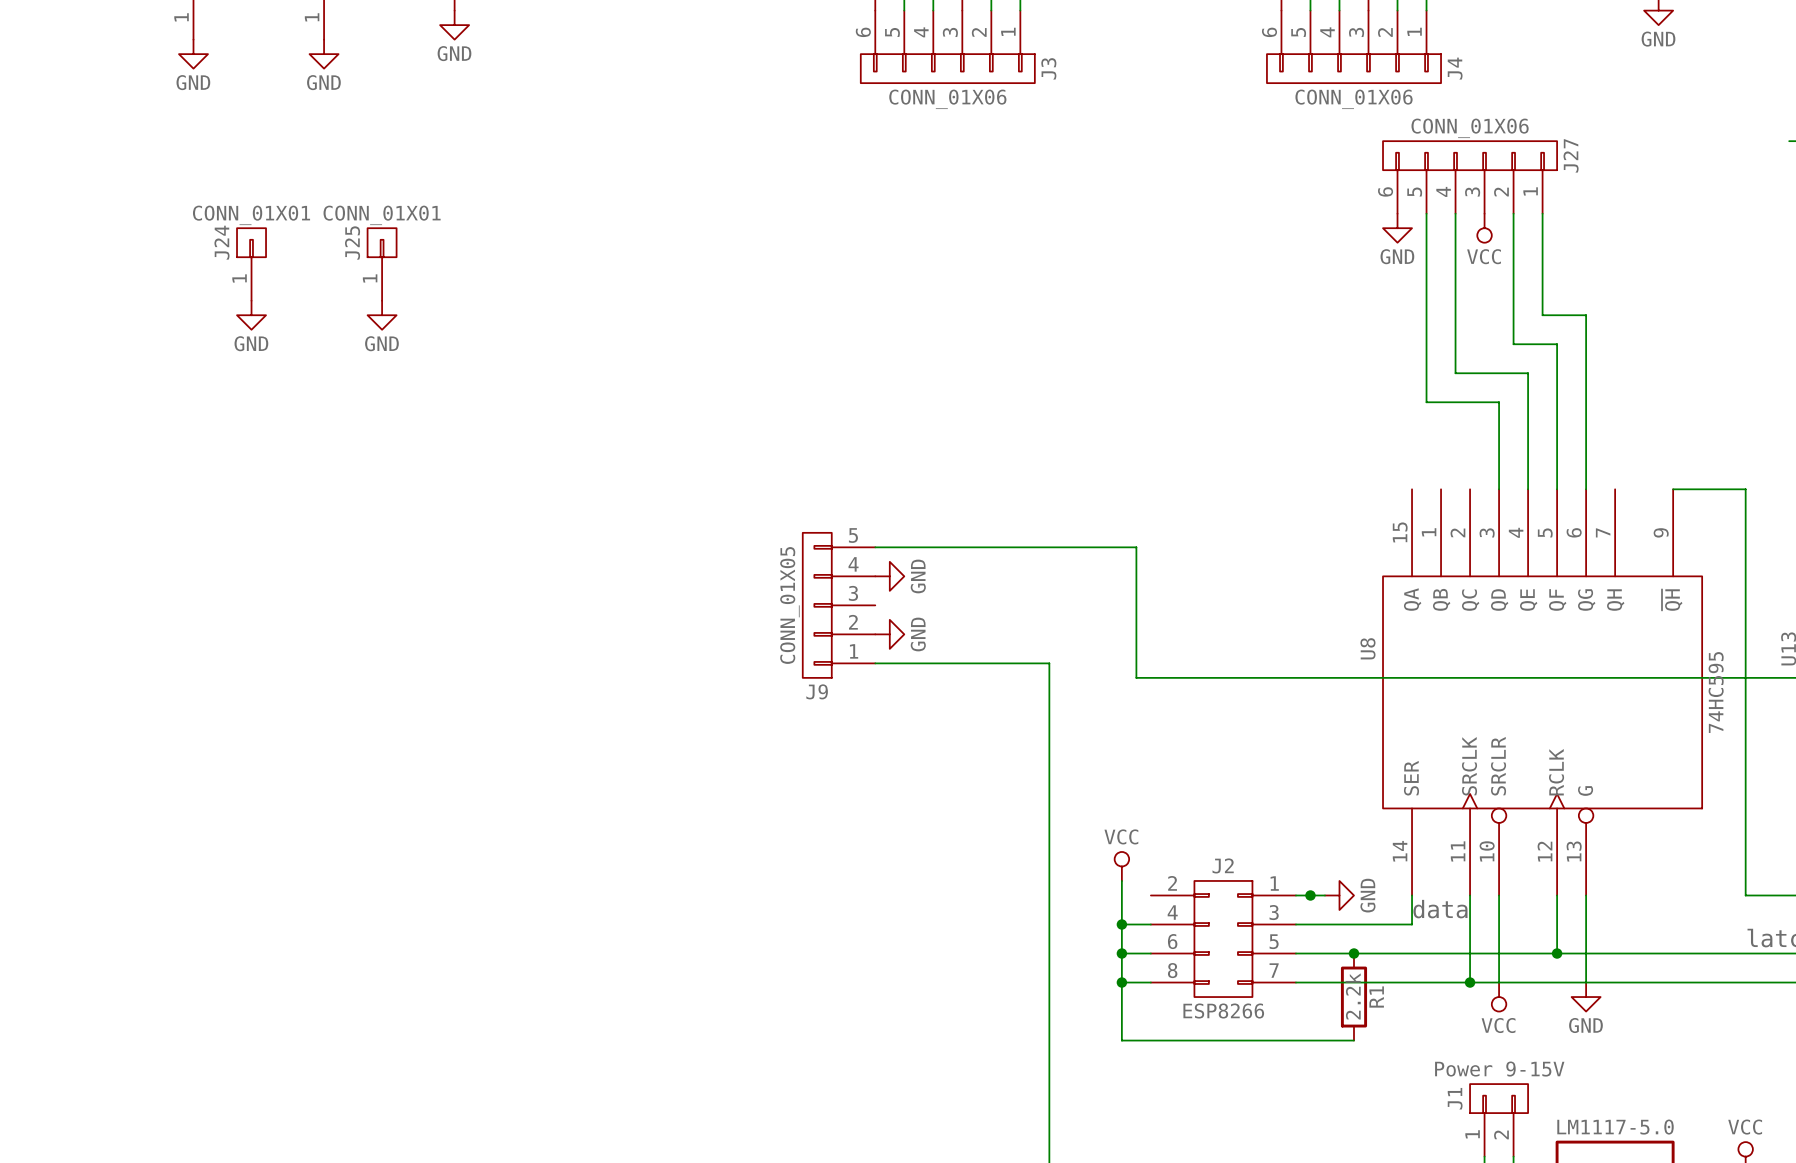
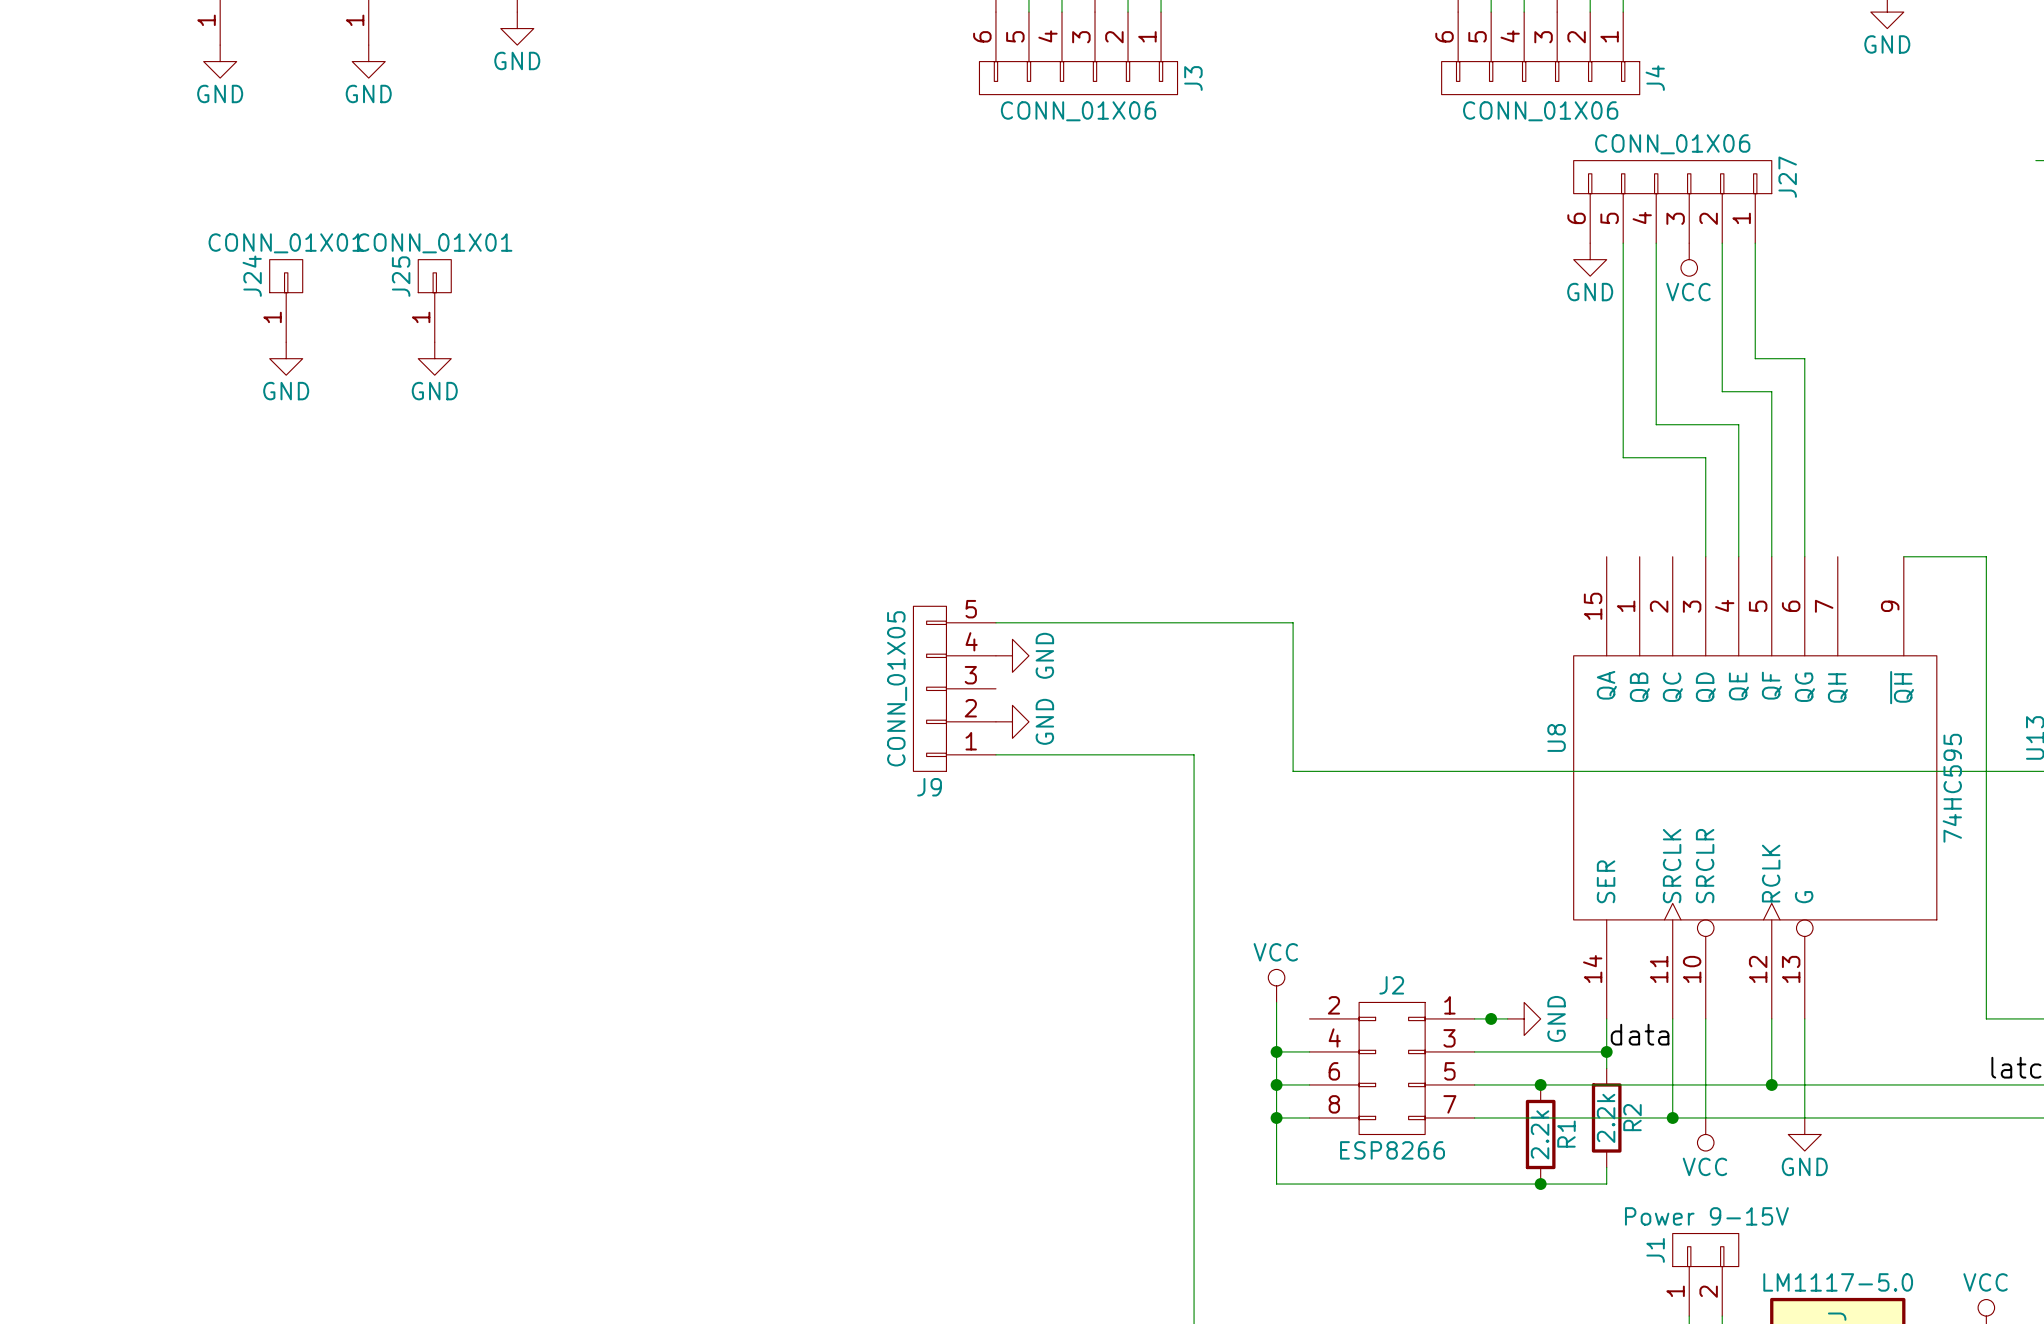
wire: none -> (1606, 1051) (1606, 1068)
junction: none -> (1606, 1051)
R2: none -> 2.2k (1606, 1117)
wire: none -> (1606, 1167) (1606, 1184) (1540, 1184)
junction: none -> (1540, 1184)

